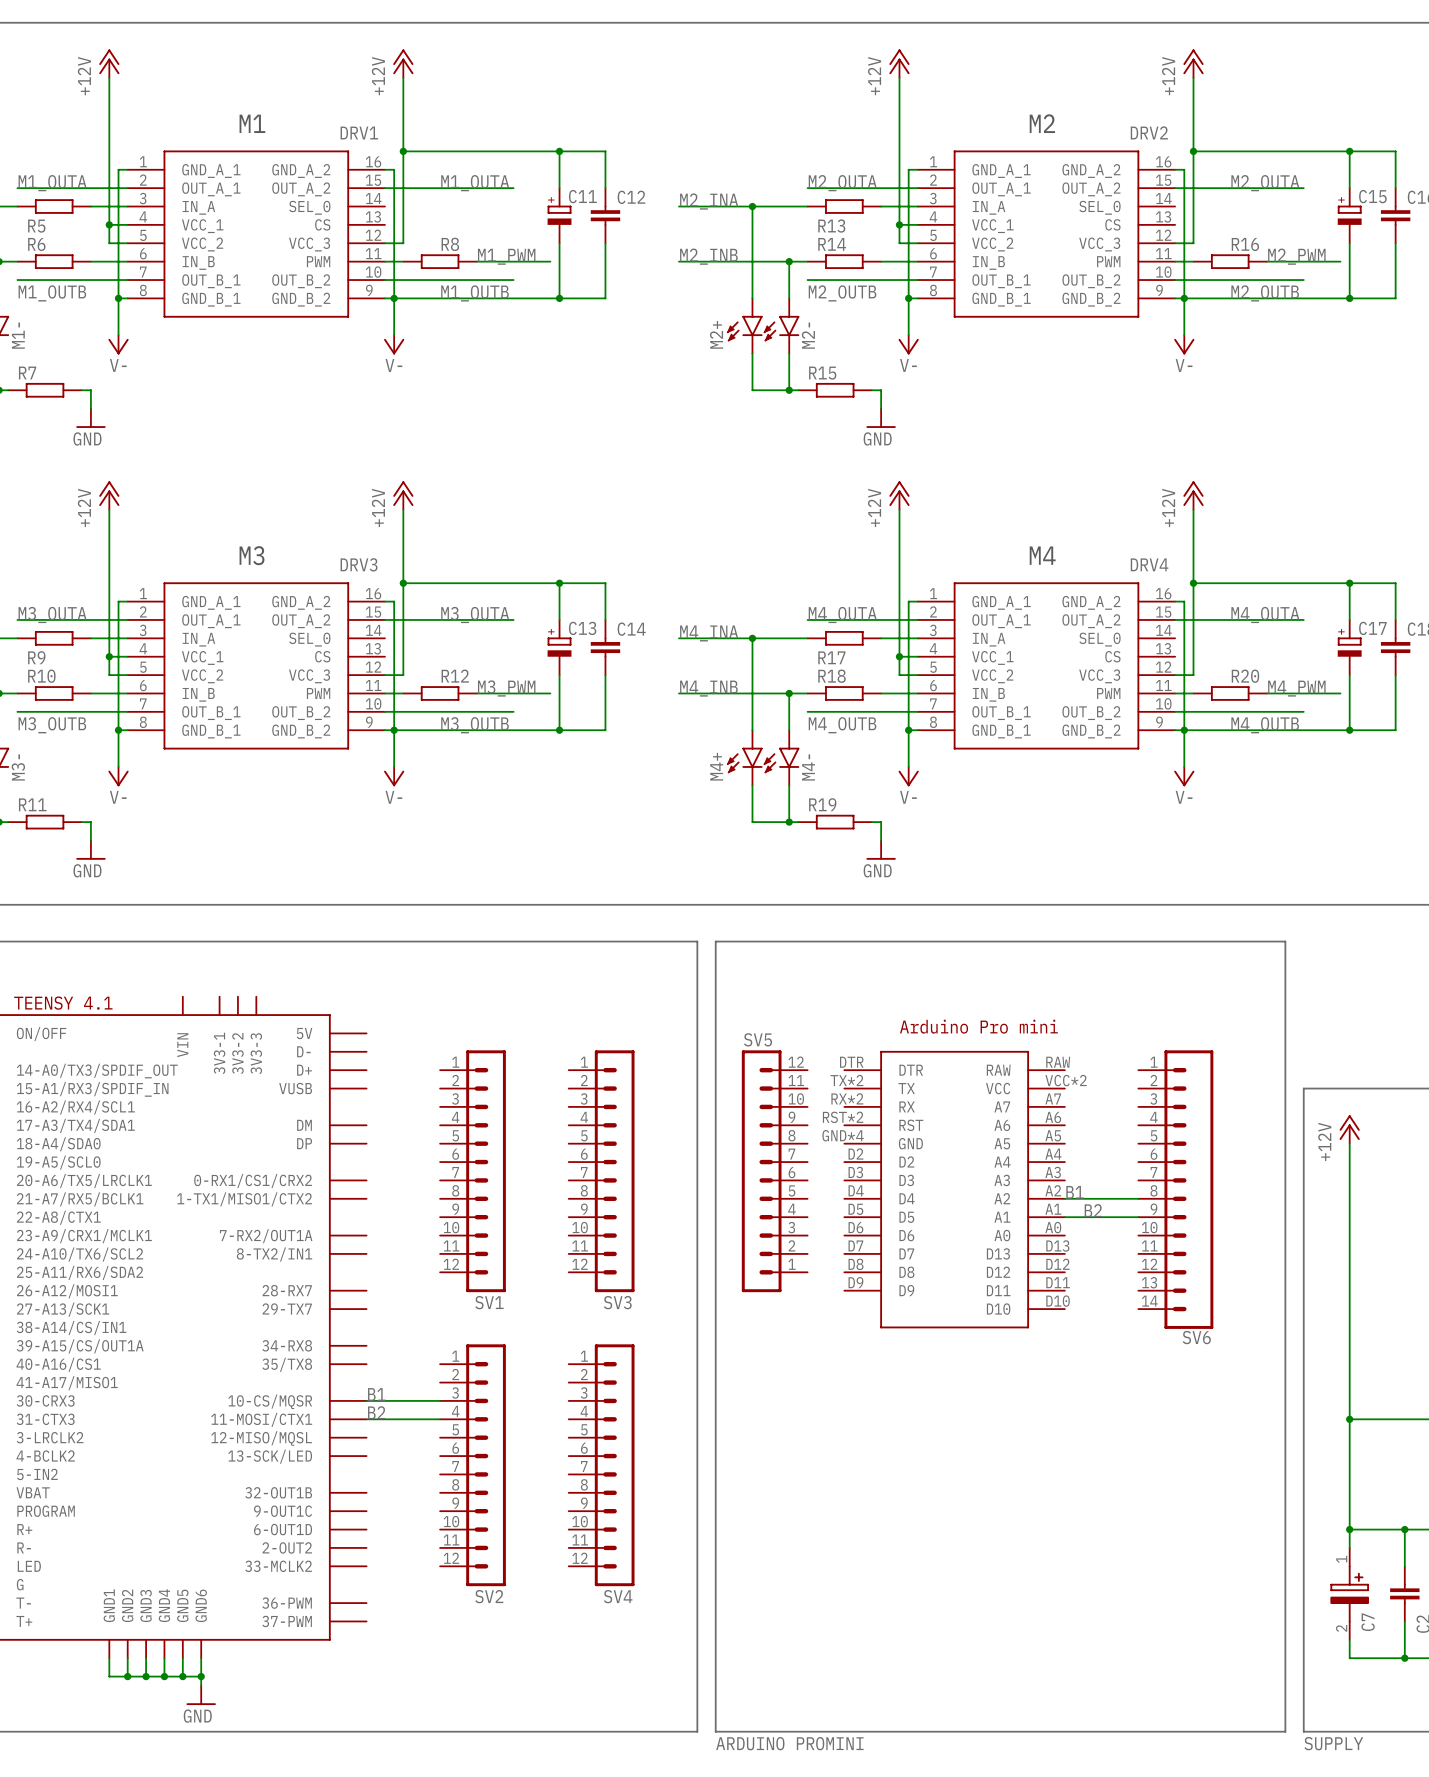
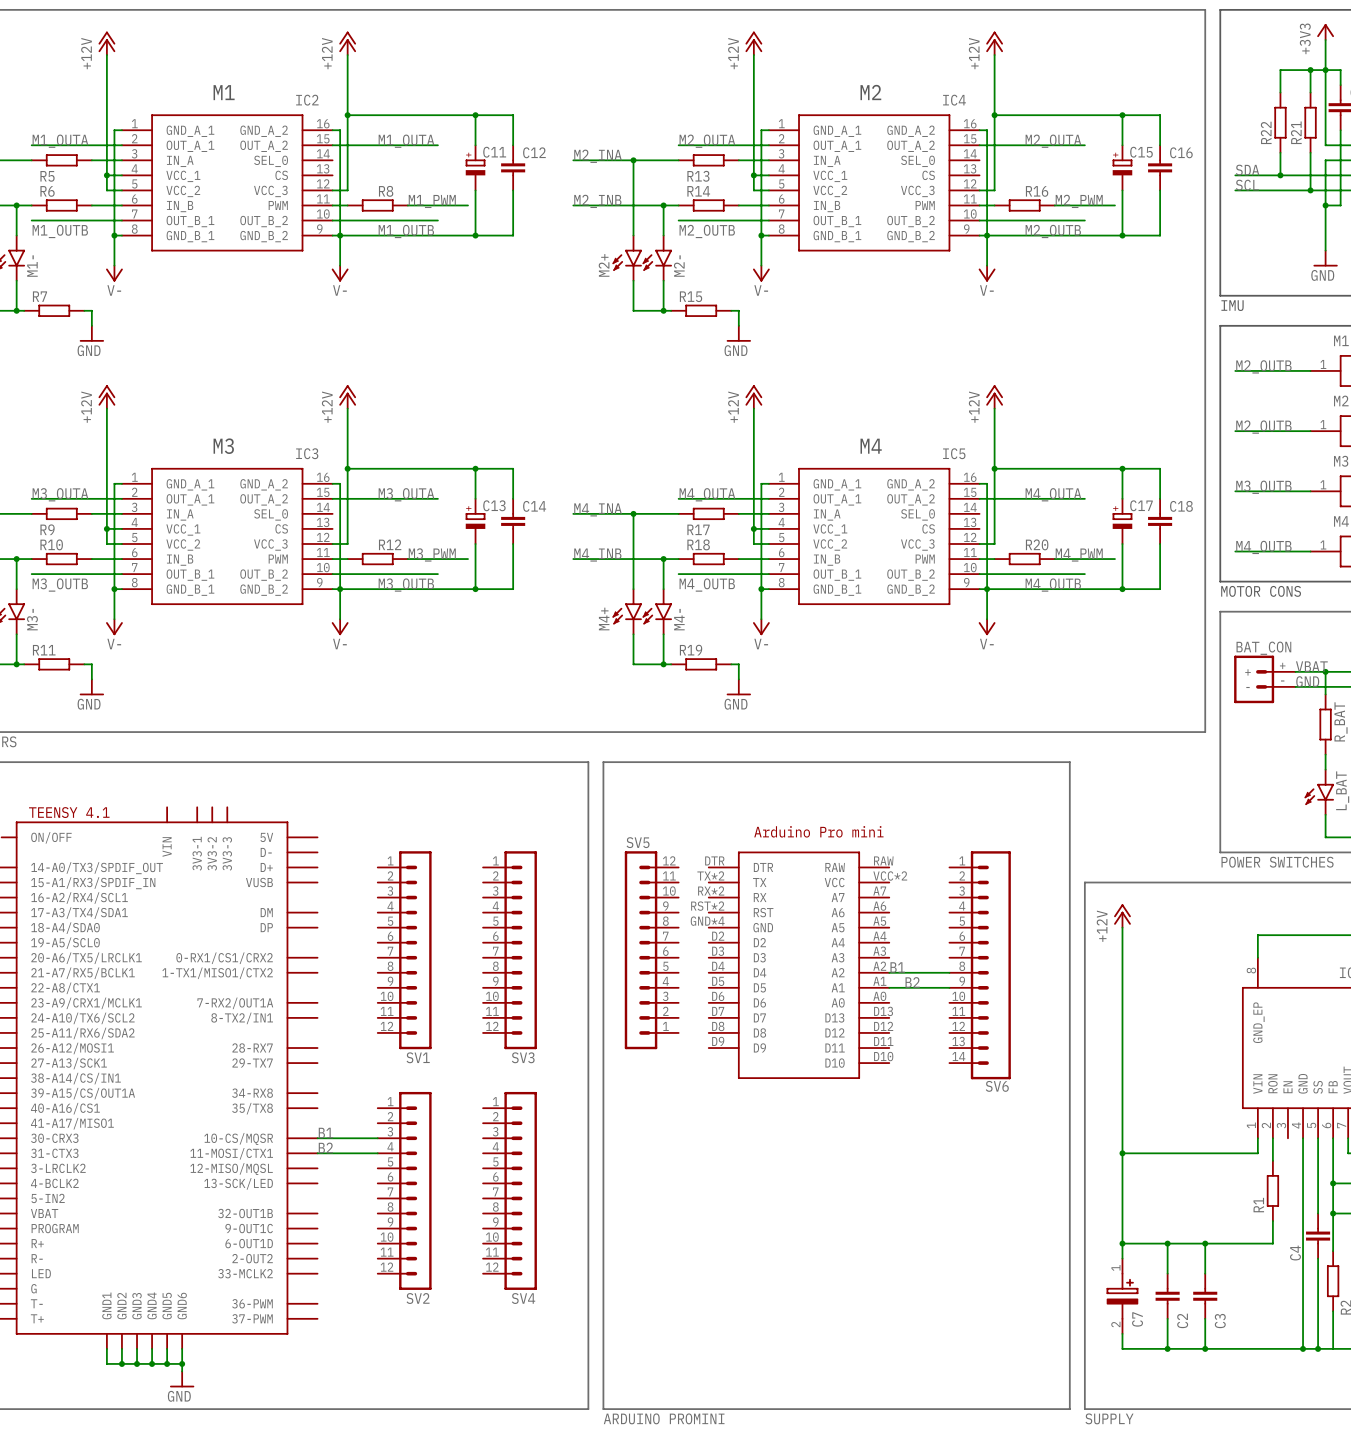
DRV2 name: DRV2 (1149, 132) -> IC4 (954, 100)
DRV1 name: DRV1 (359, 133) -> IC2 (307, 100)
DRV3 name: DRV3 (359, 564) -> IC3 (307, 453)
DRV4 name: DRV4 (1149, 564) -> IC5 (954, 453)

